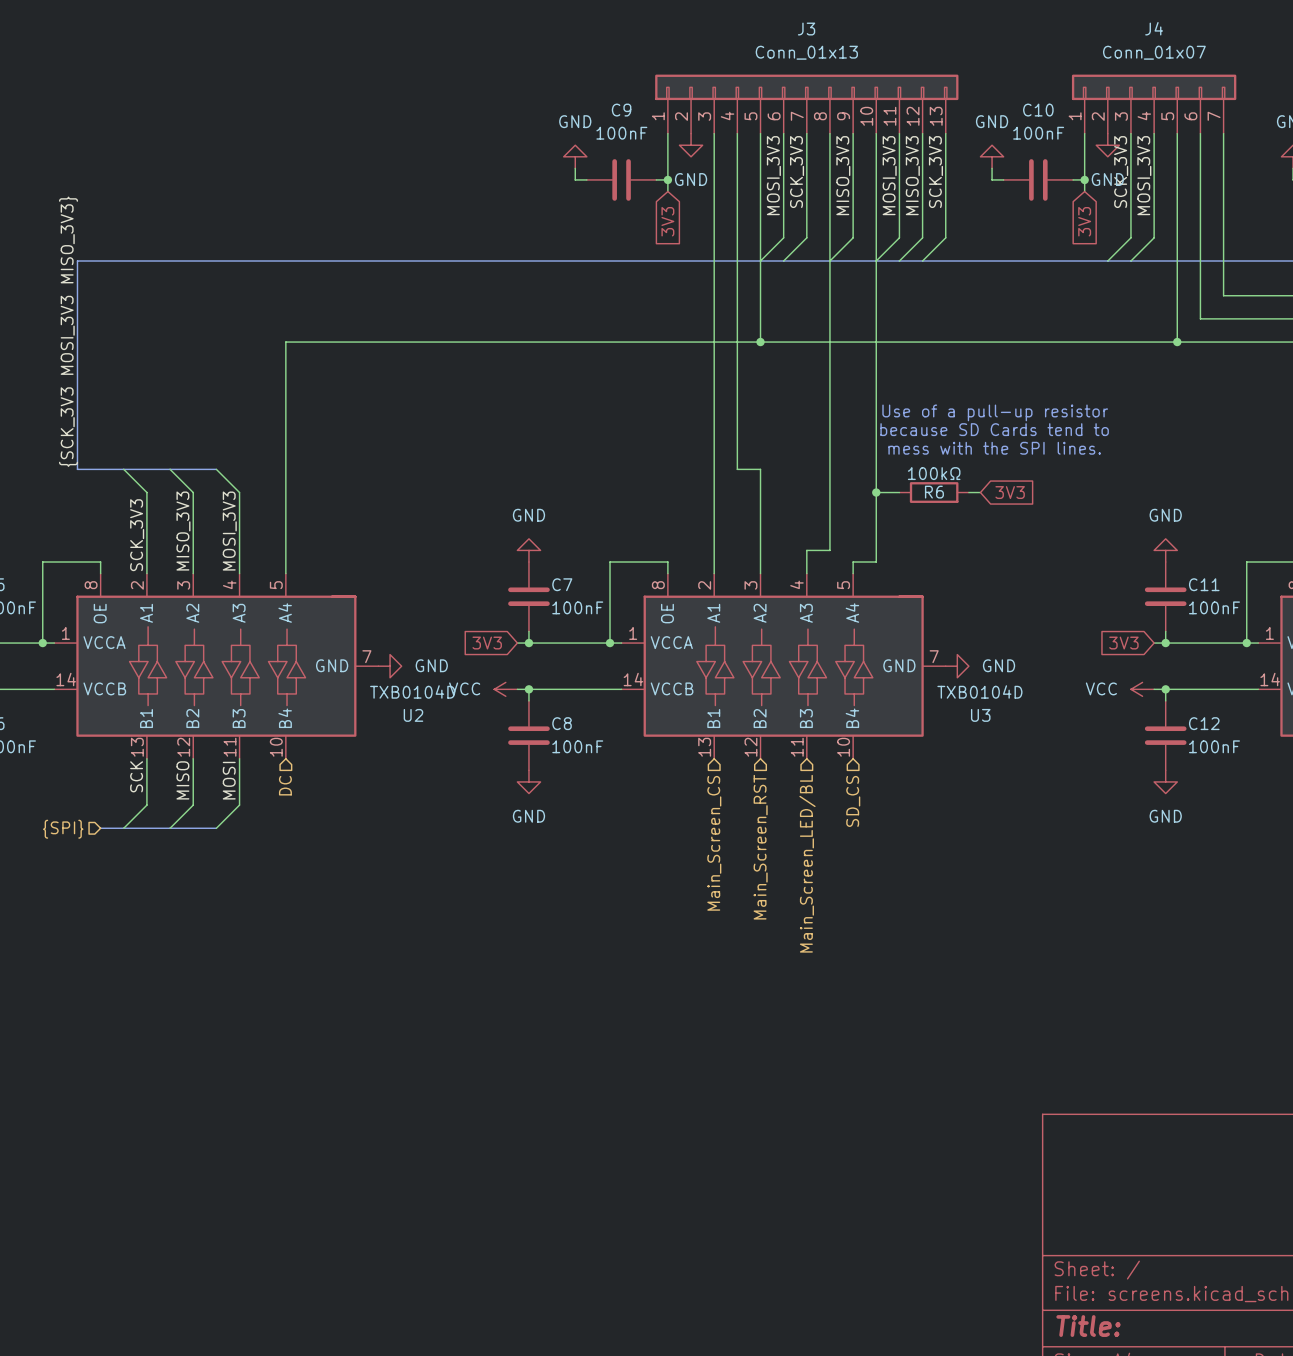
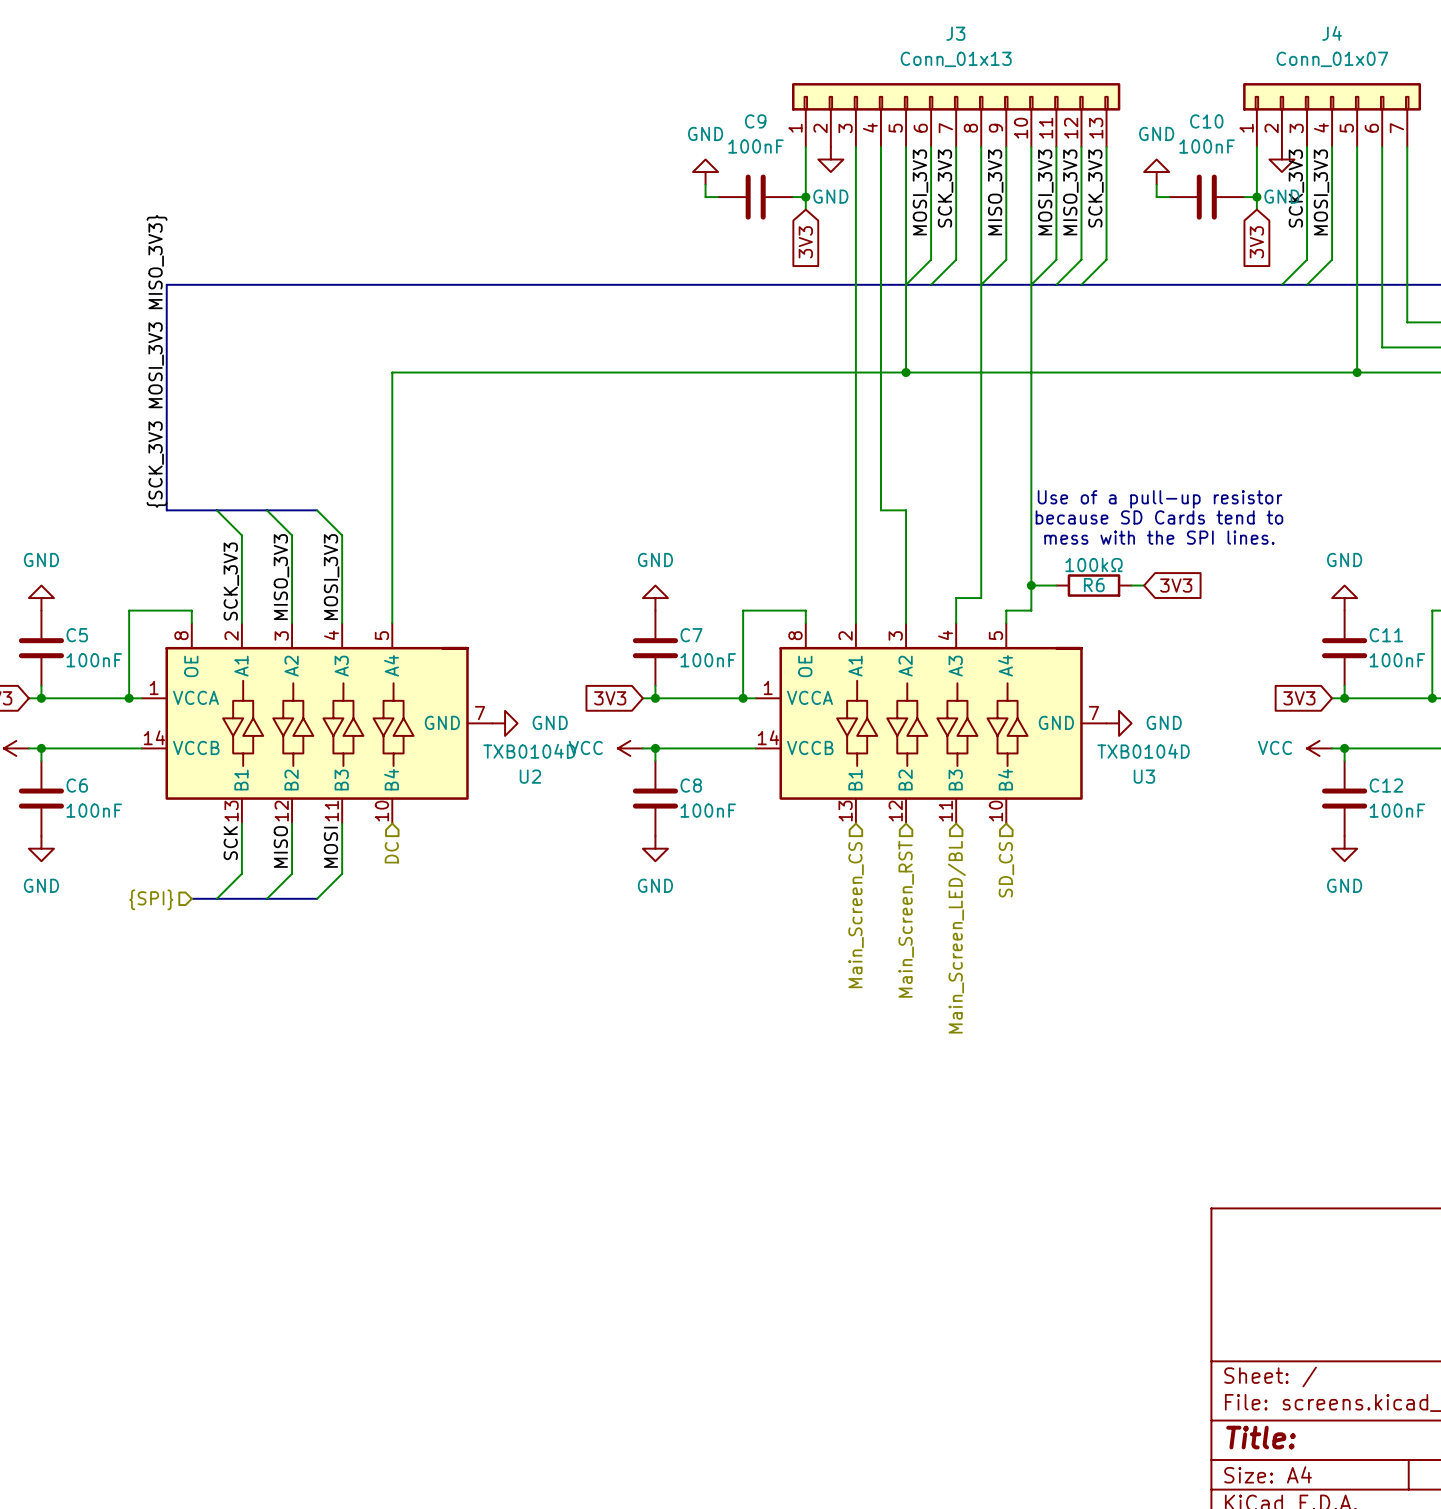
text: Use of a pull-up resistor (995, 412) -> none
text position: because SD Cards tend to (994, 429) -> because SD Cards tend to (1159, 517)
text: mess with the SPI lines. (994, 448) -> Use of a pull-up resistor (1160, 499)
wire: (876, 492) (899, 492) -> (1031, 585) (1056, 585)
junction position: (876, 492) -> (1031, 585)
R6 position: (934, 492) -> (1094, 585)
wire: (968, 492) (980, 492) -> (1131, 585) (1144, 585)
global label position: 3V3 (1010, 492) -> 3V3 (1176, 585)
text: none -> mess with the SPI lines. (1159, 537)

